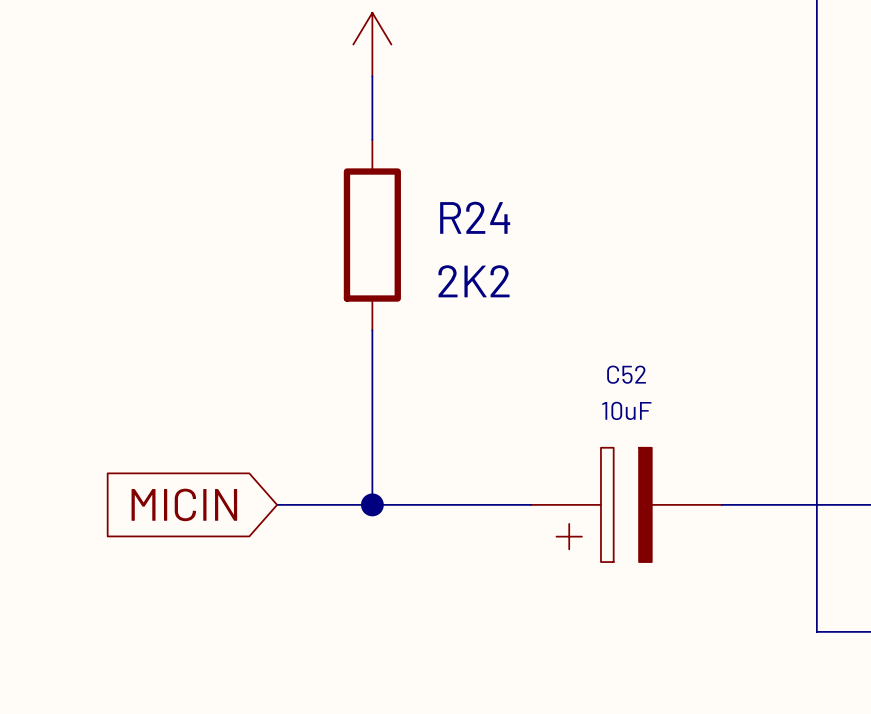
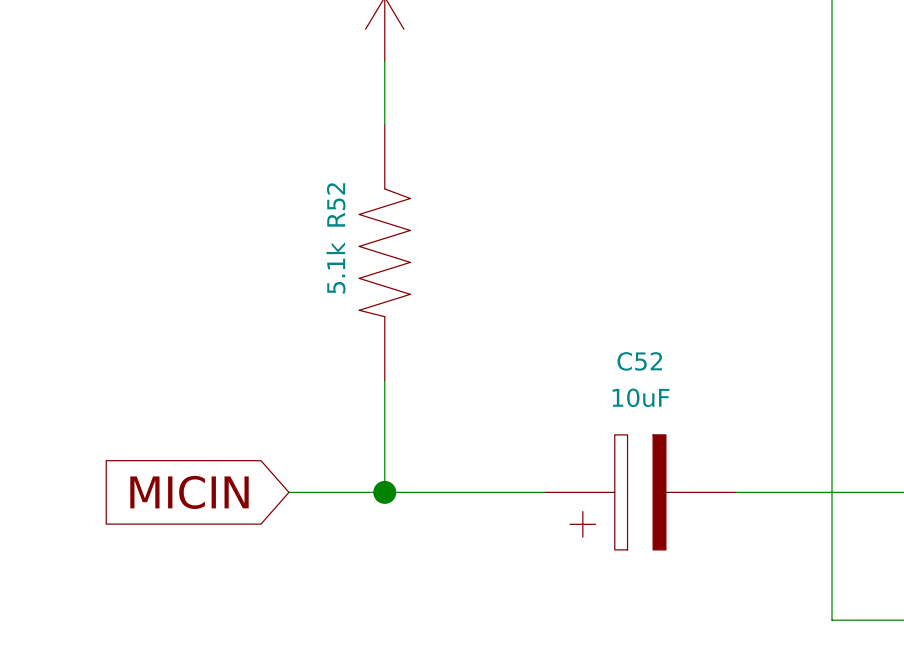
R24: 2K2 (372, 235) -> none
R52: none -> 5.1k (384, 252)

